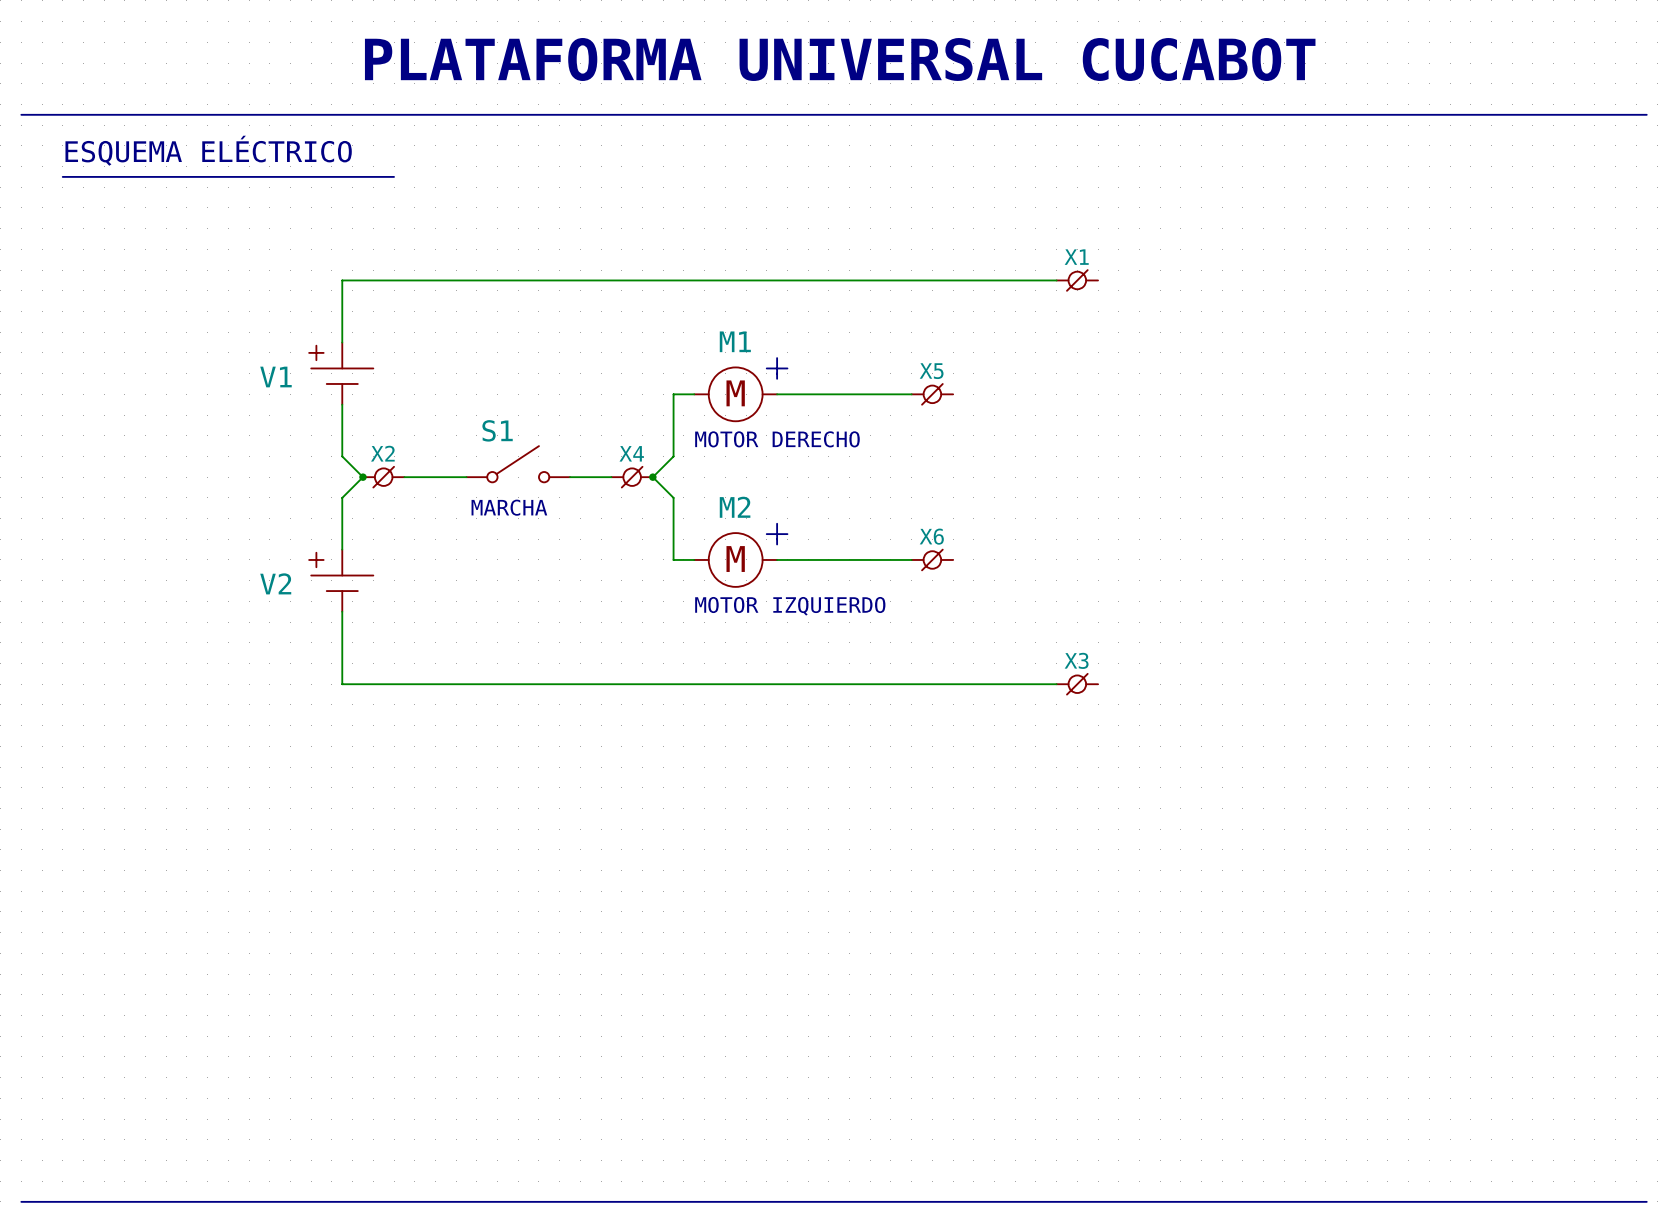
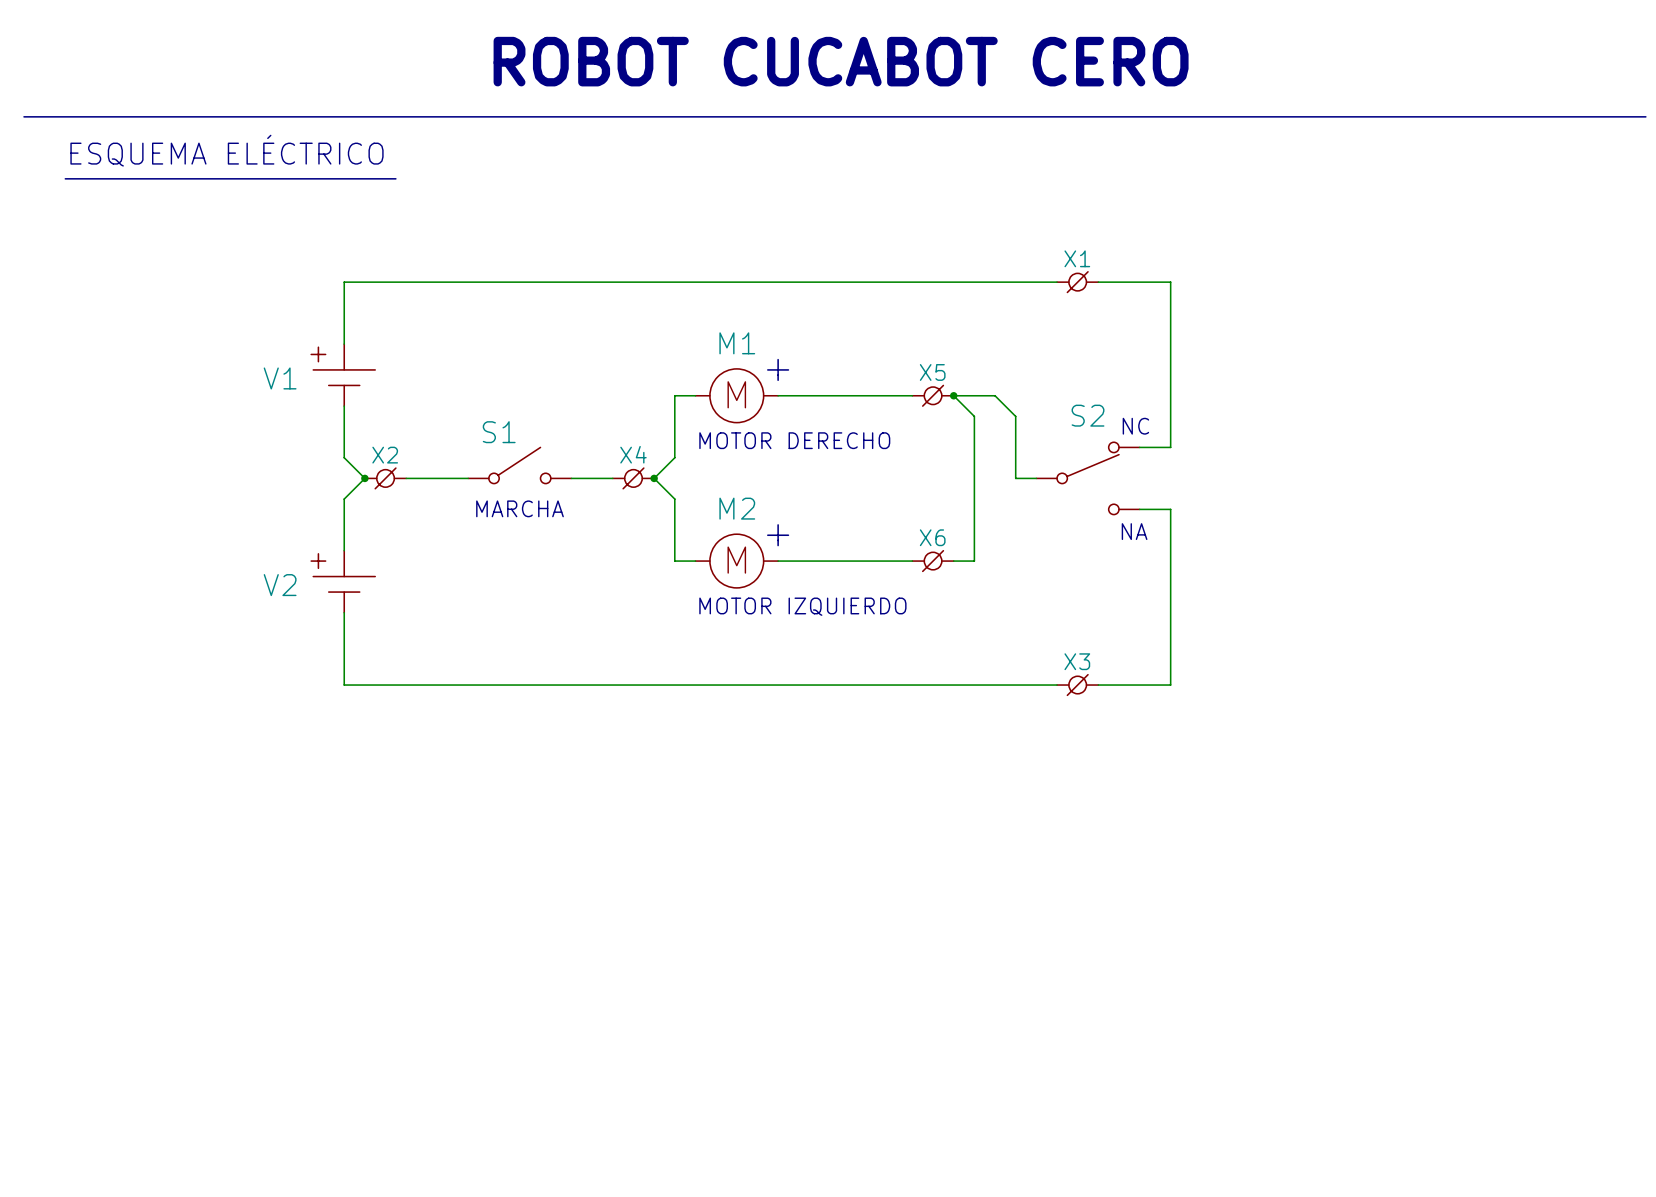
text: PLATAFORMA UNIVERSAL CUCABOT (840, 59) -> ROBOT CUCABOT CERO (841, 61)
wire: none -> (1098, 282) (1170, 282) (1170, 447) (1139, 447)
junction: none -> (953, 395)
text: none -> NC (1135, 426)
wire: none -> (1036, 478) (1015, 478) (1015, 416) (995, 395) (953, 395) (974, 416) (974, 561) (953, 561)
S2: none -> (1088, 478)
wire: none -> (1139, 509) (1170, 509) (1170, 685) (1098, 685)
text: none -> NA (1134, 531)

